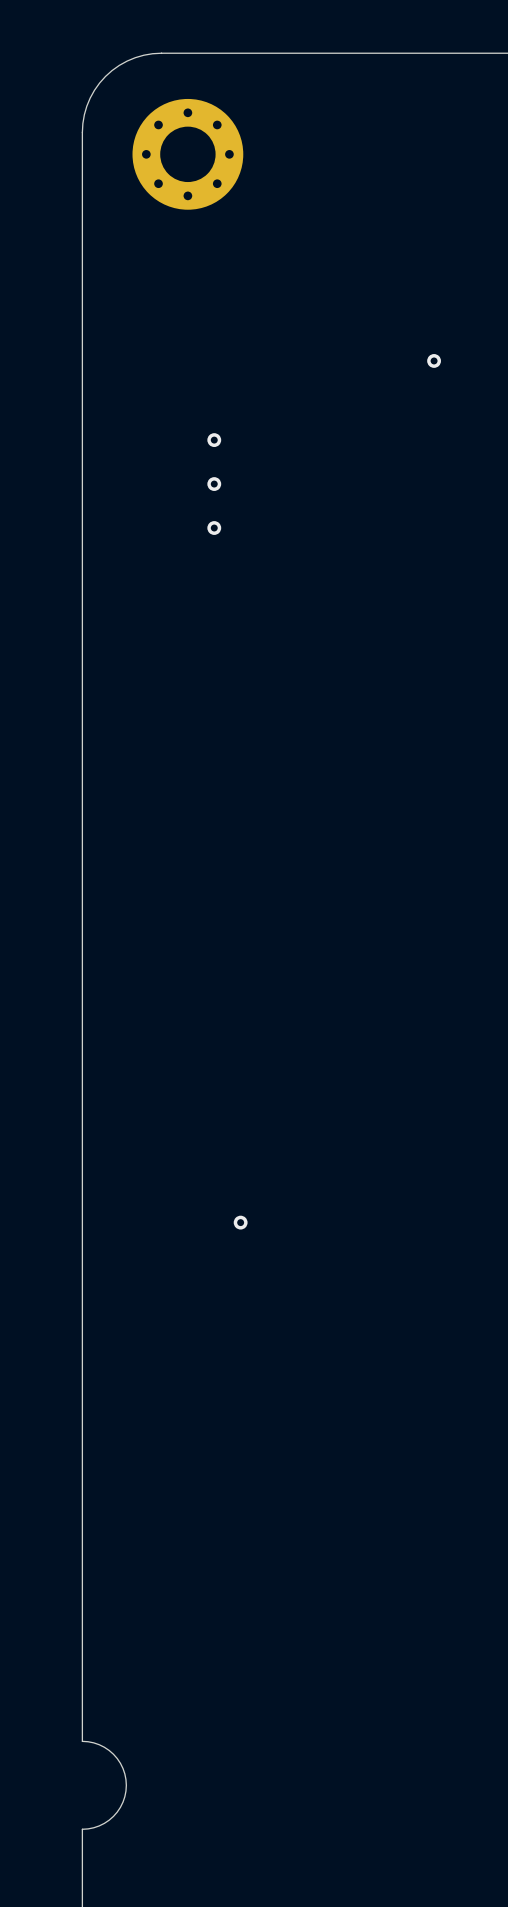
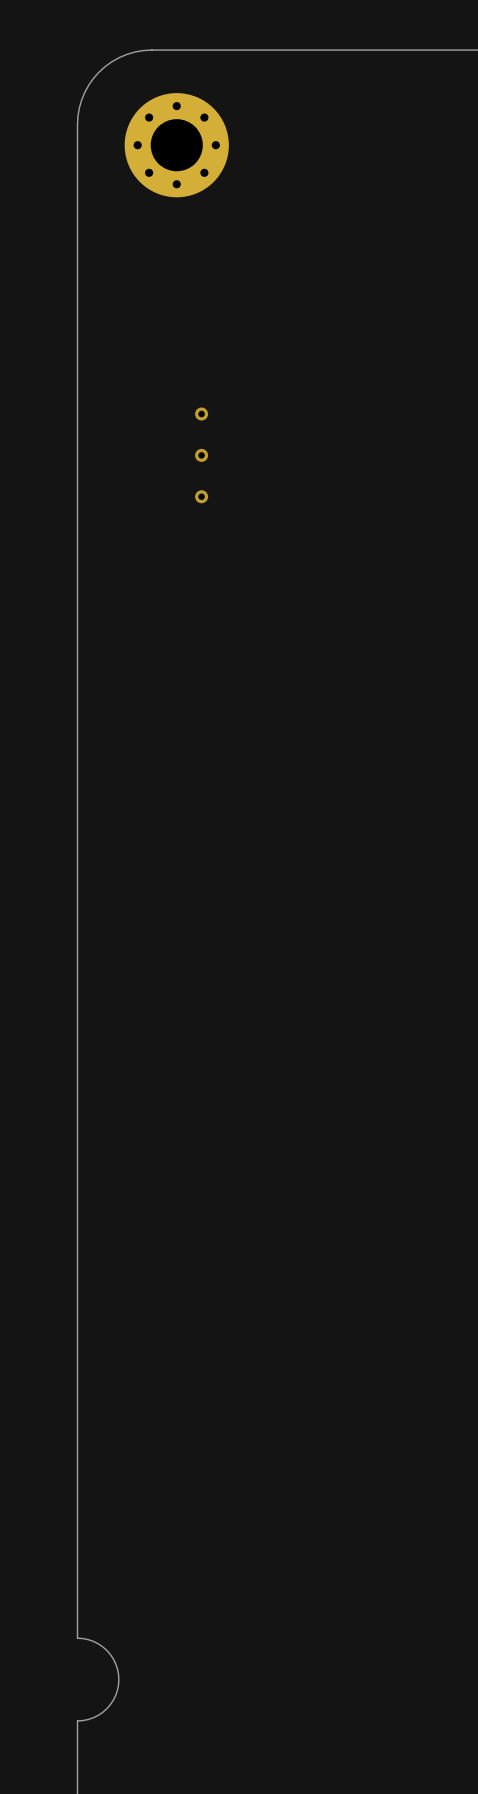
via: (434, 360) -> none
via: (240, 1222) -> none

